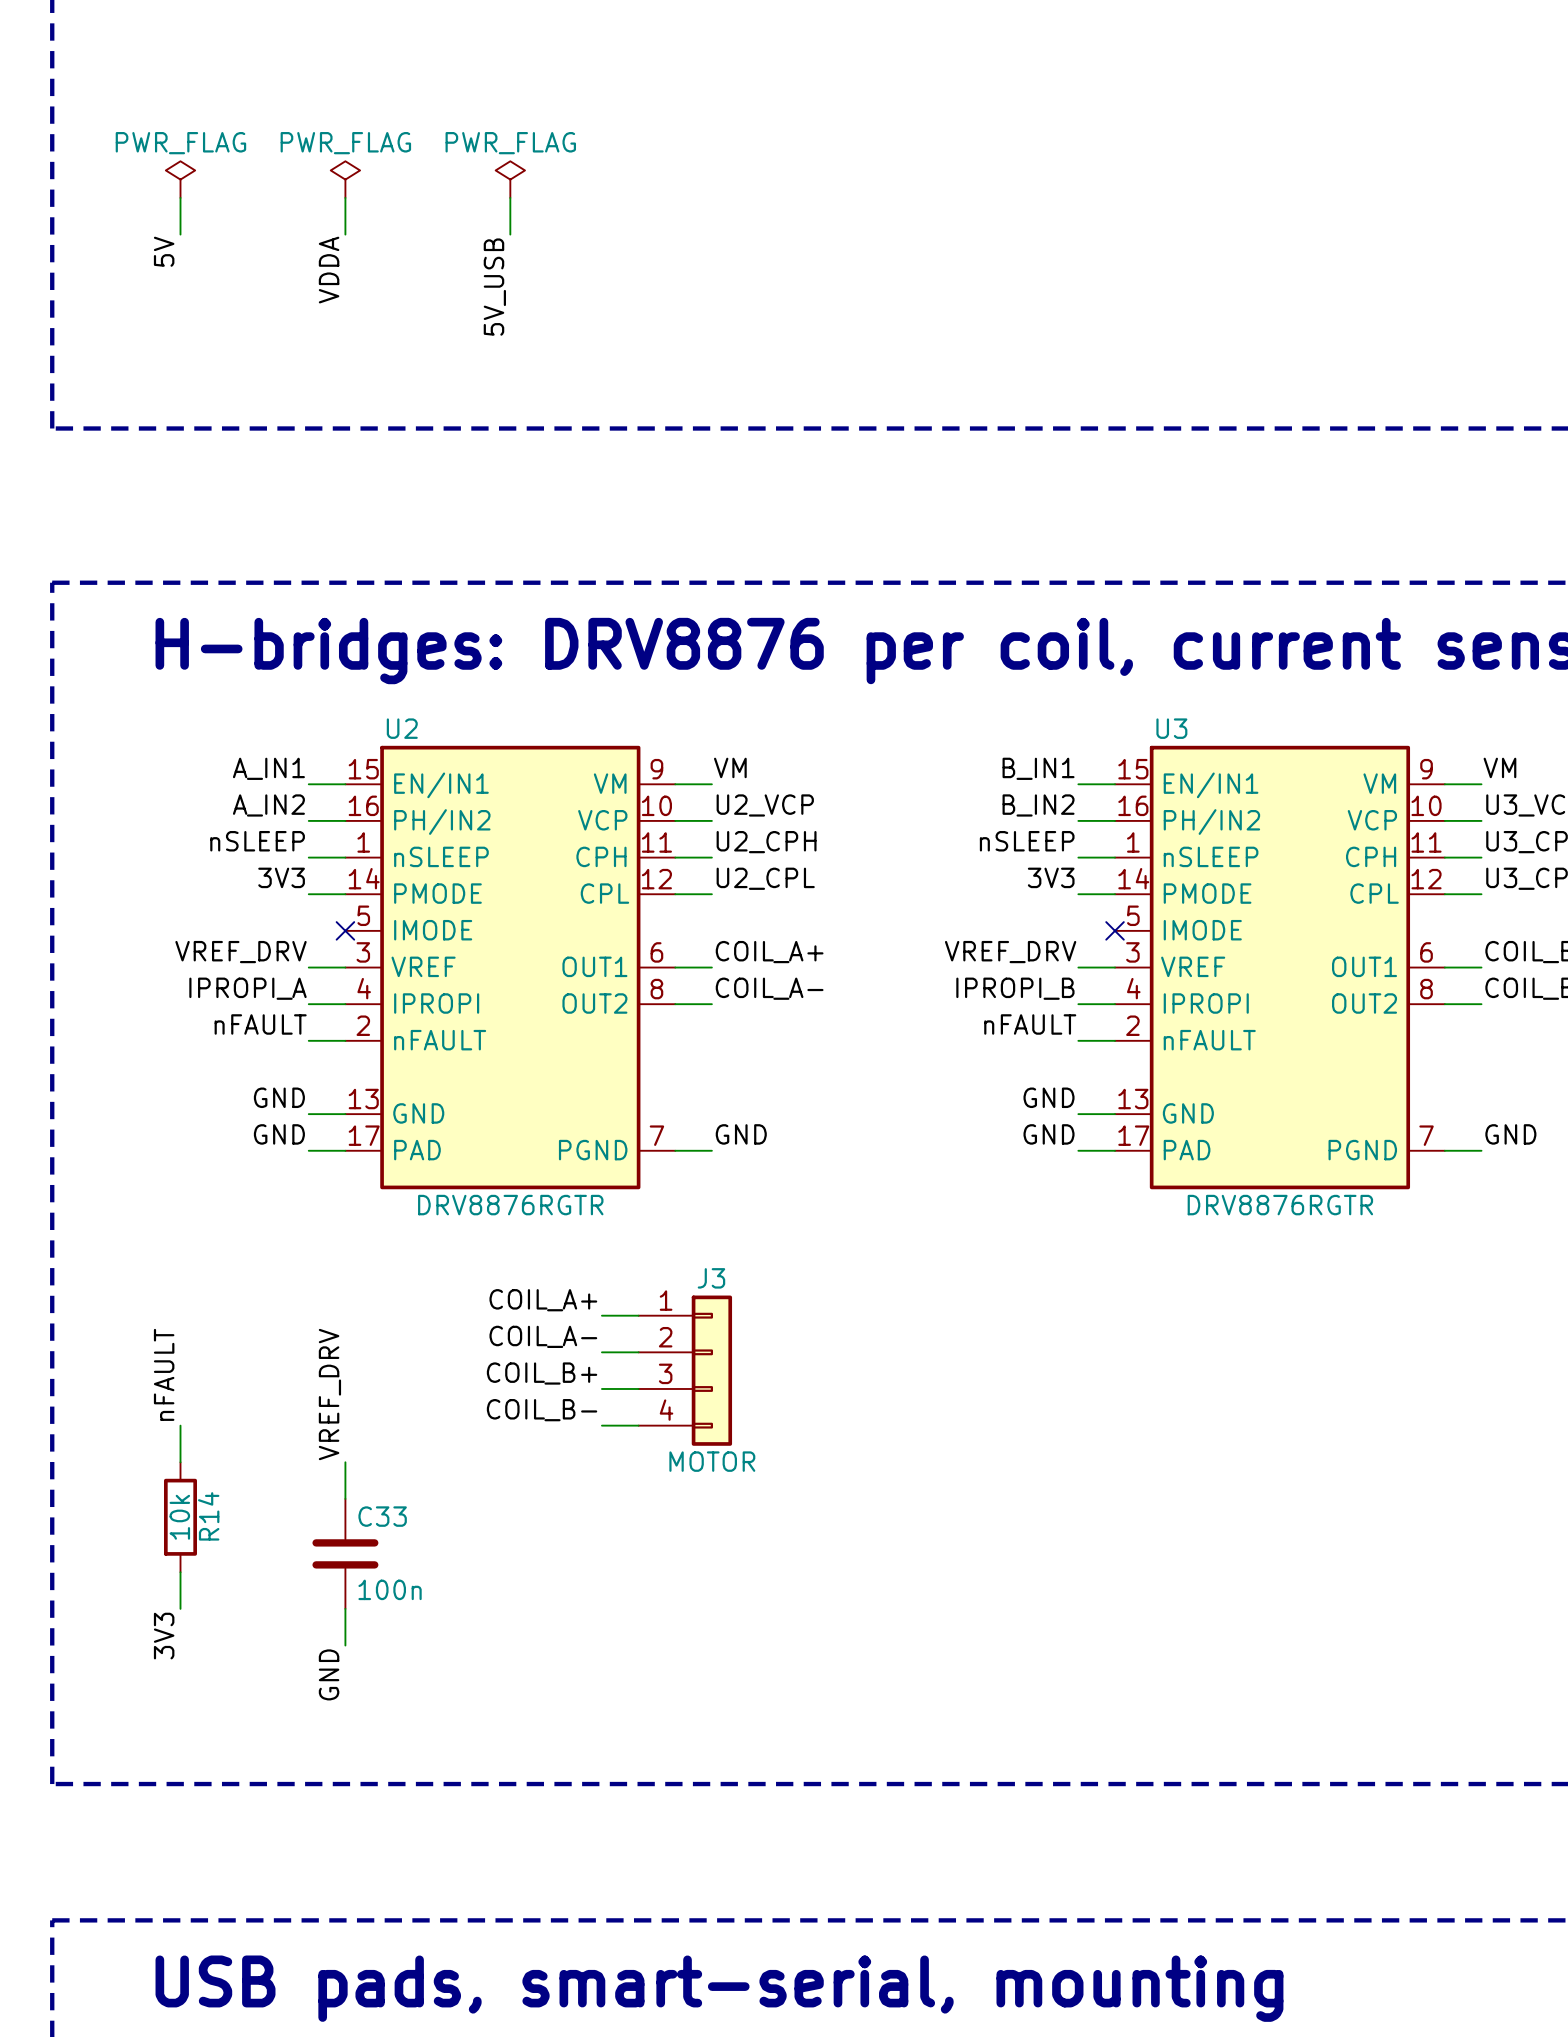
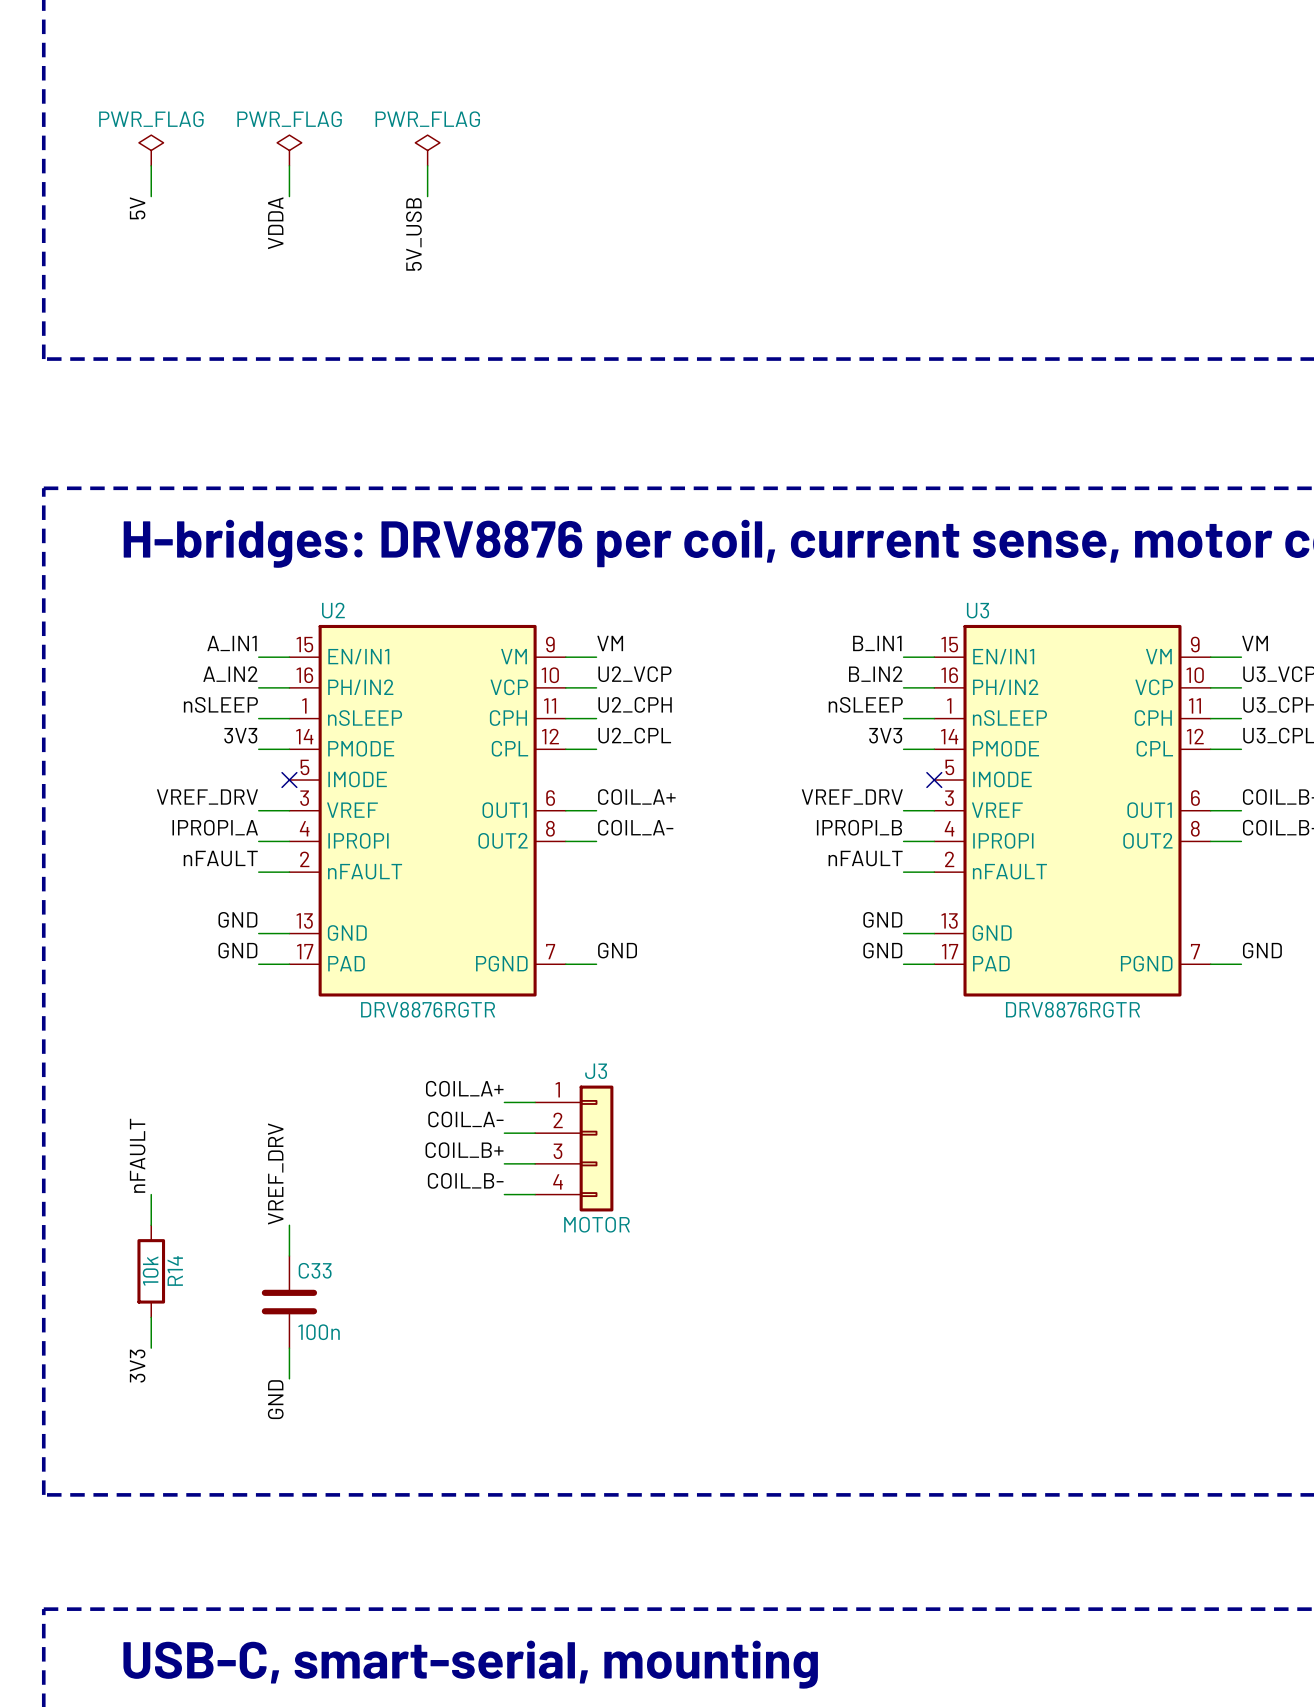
text: USB pads, smart-serial, mounting (719, 1988) -> USB-C, smart-serial, mounting (470, 1664)

